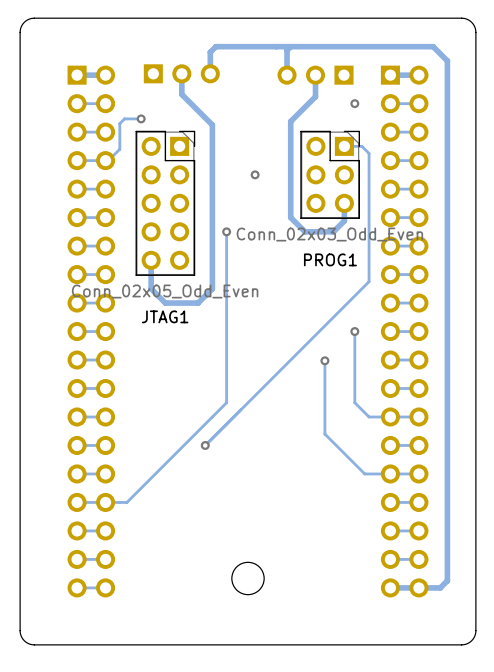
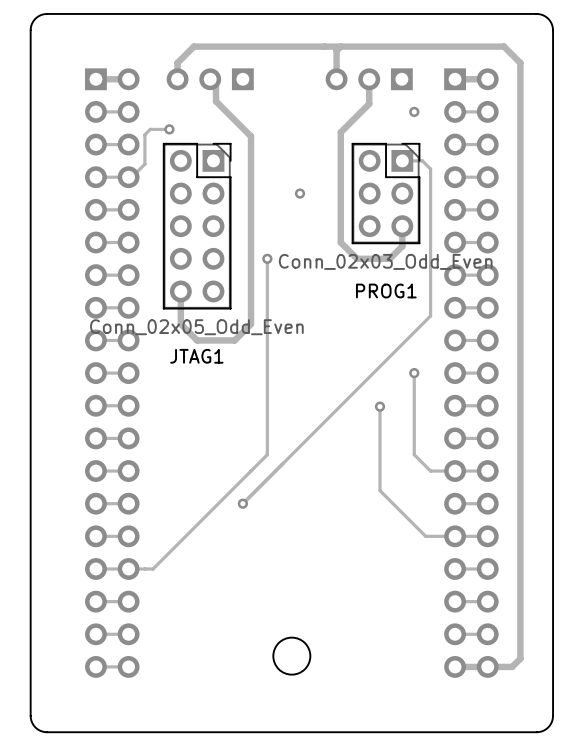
track: (215, 46) (210, 52) (210, 73) -> (255, 46) (193, 46) (177, 62) (177, 79)
part rotation: 0° (181, 73) -> 180° (210, 79)

